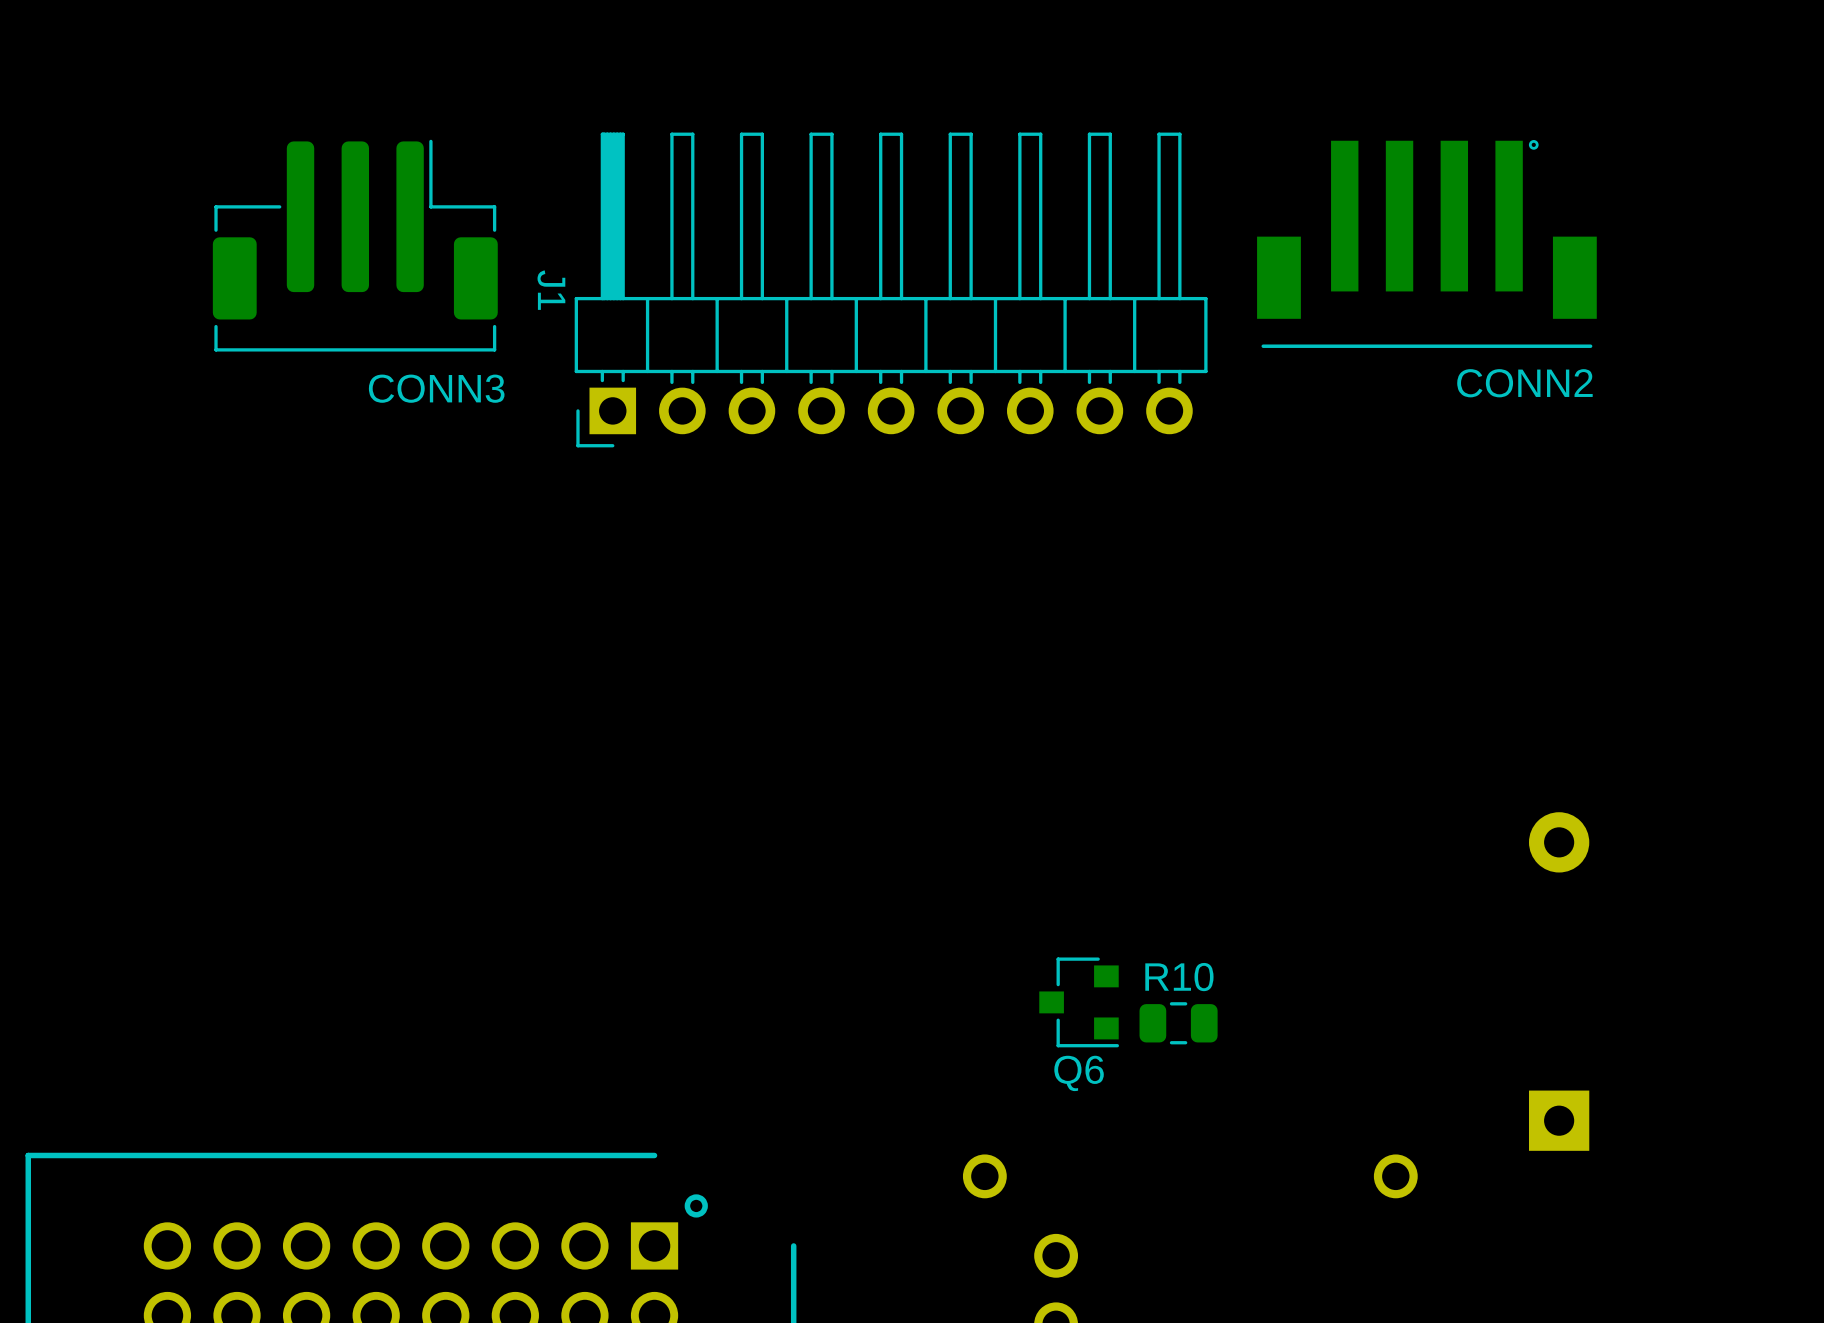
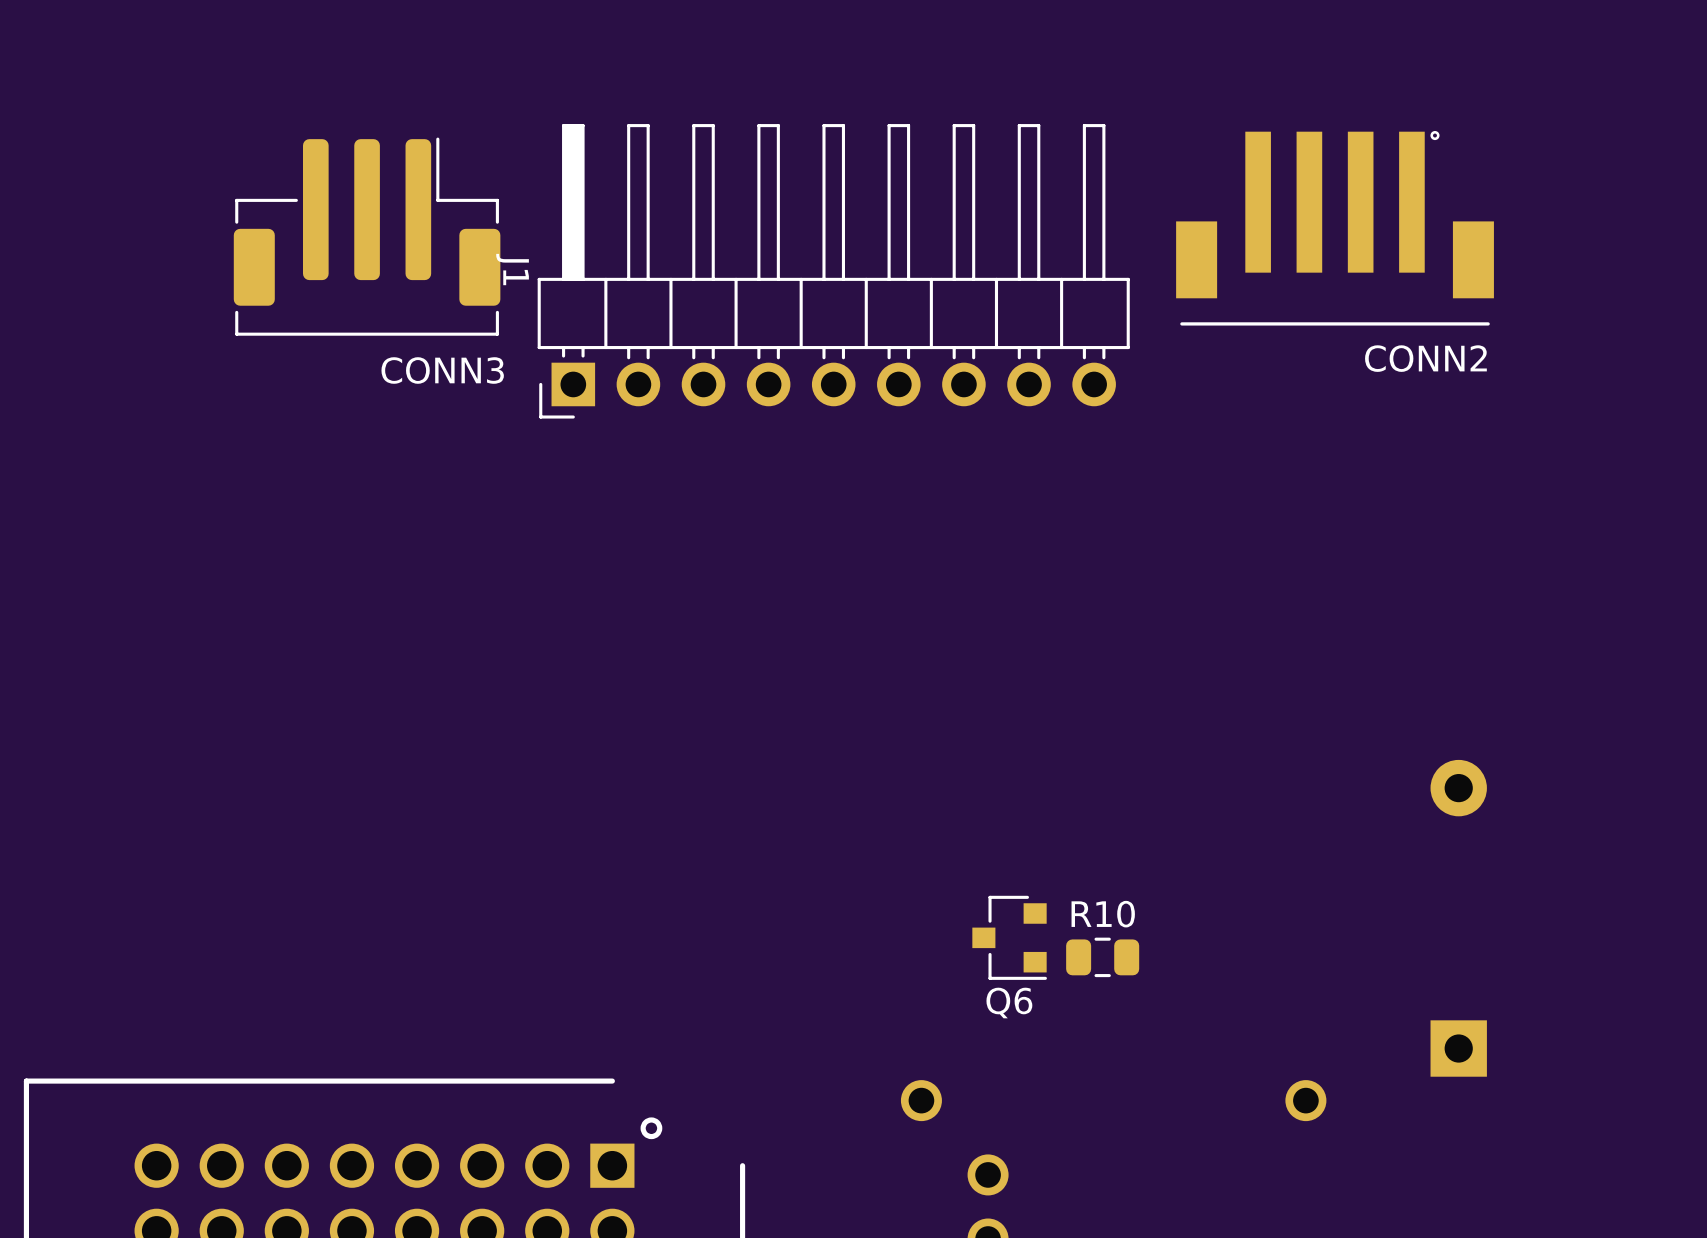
CONN3 position: (355, 245) -> (367, 236)

